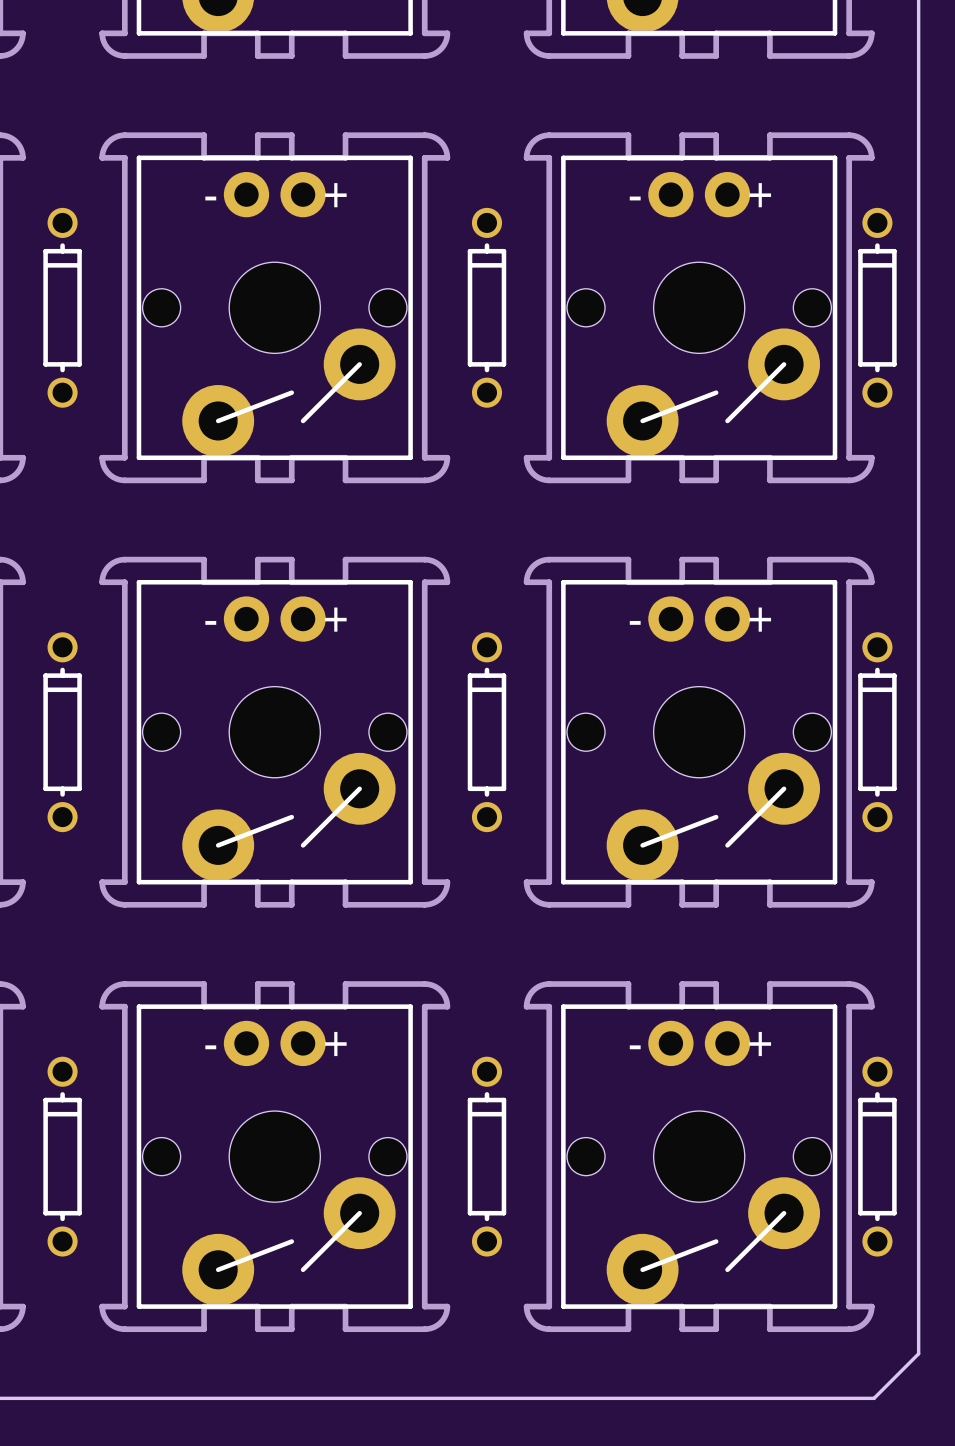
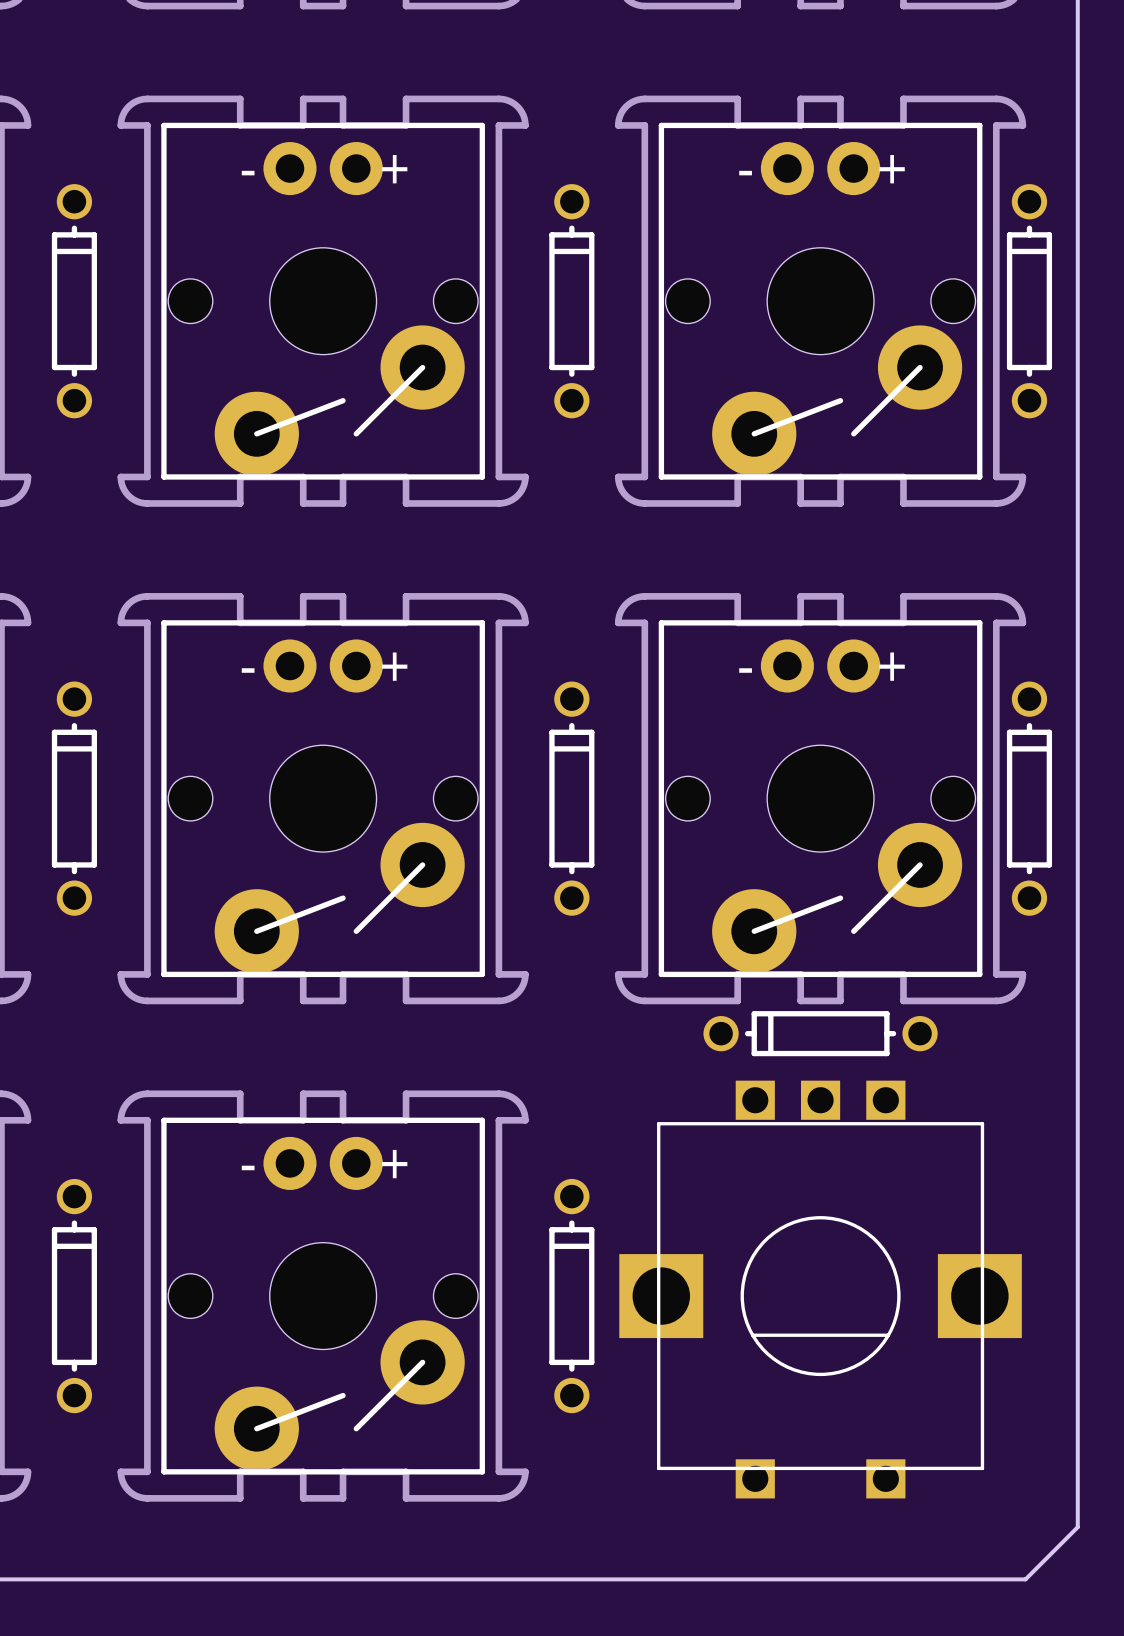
part footprint: [523, 981, 875, 1333] -> [619, 1080, 1022, 1499]
part rotation: 0° (877, 1156) -> 90° counterclockwise (820, 1033)
part position: (877, 1156) -> (820, 1033)

